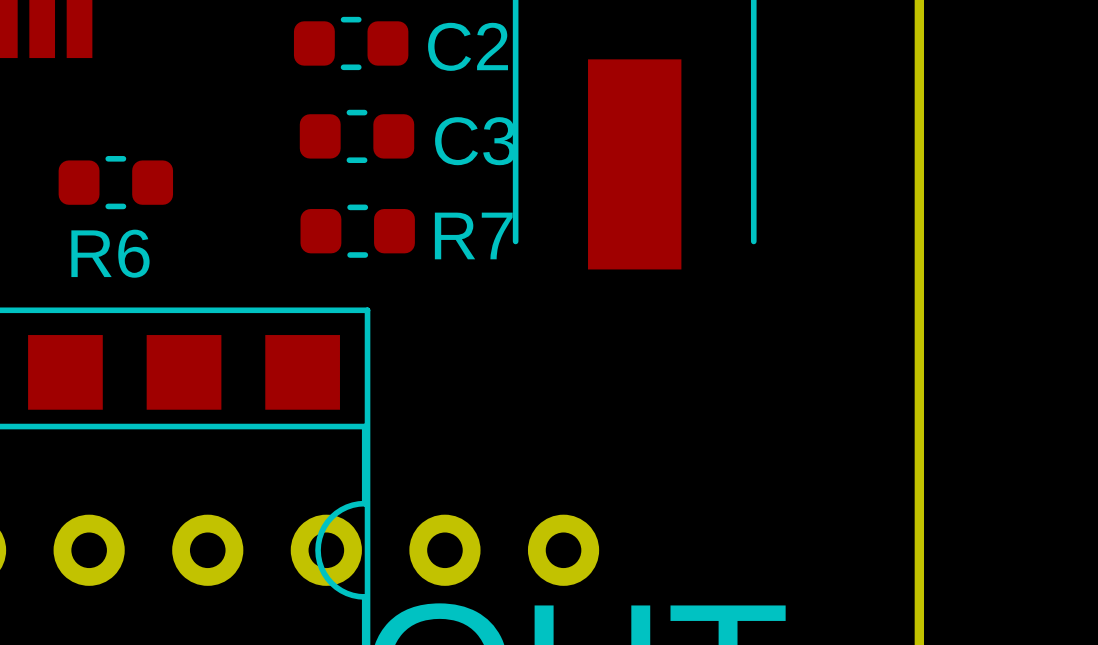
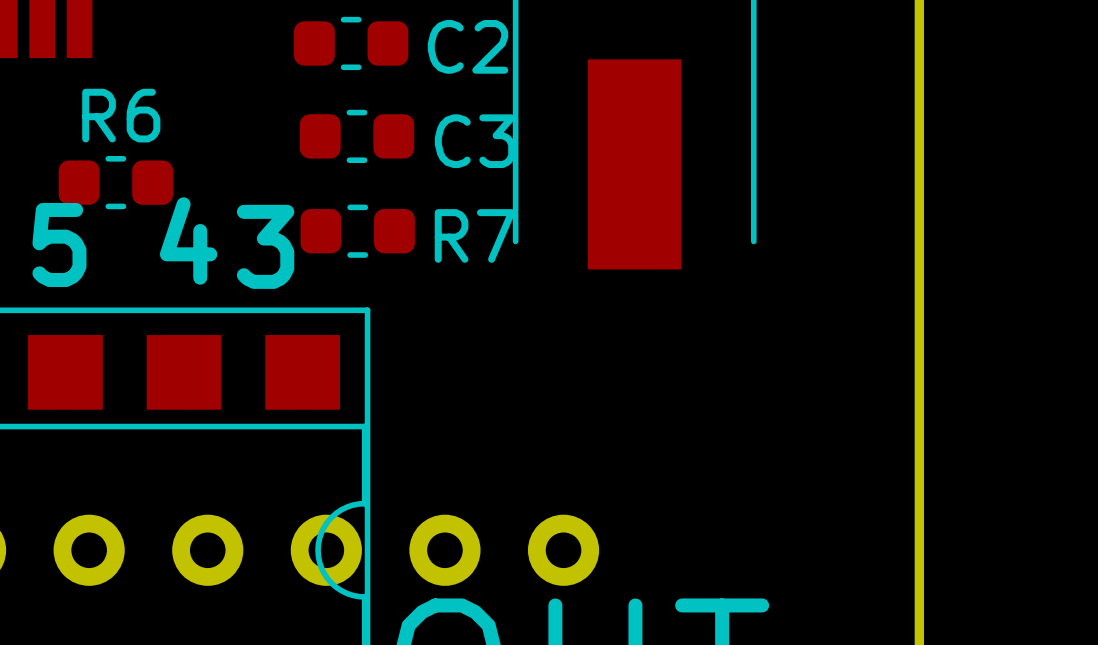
text: none -> 4 (188, 240)
text: none -> 5 (59, 245)
text: none -> 3 (265, 246)
R6 name position: R6 (110, 253) -> R6 (121, 115)

